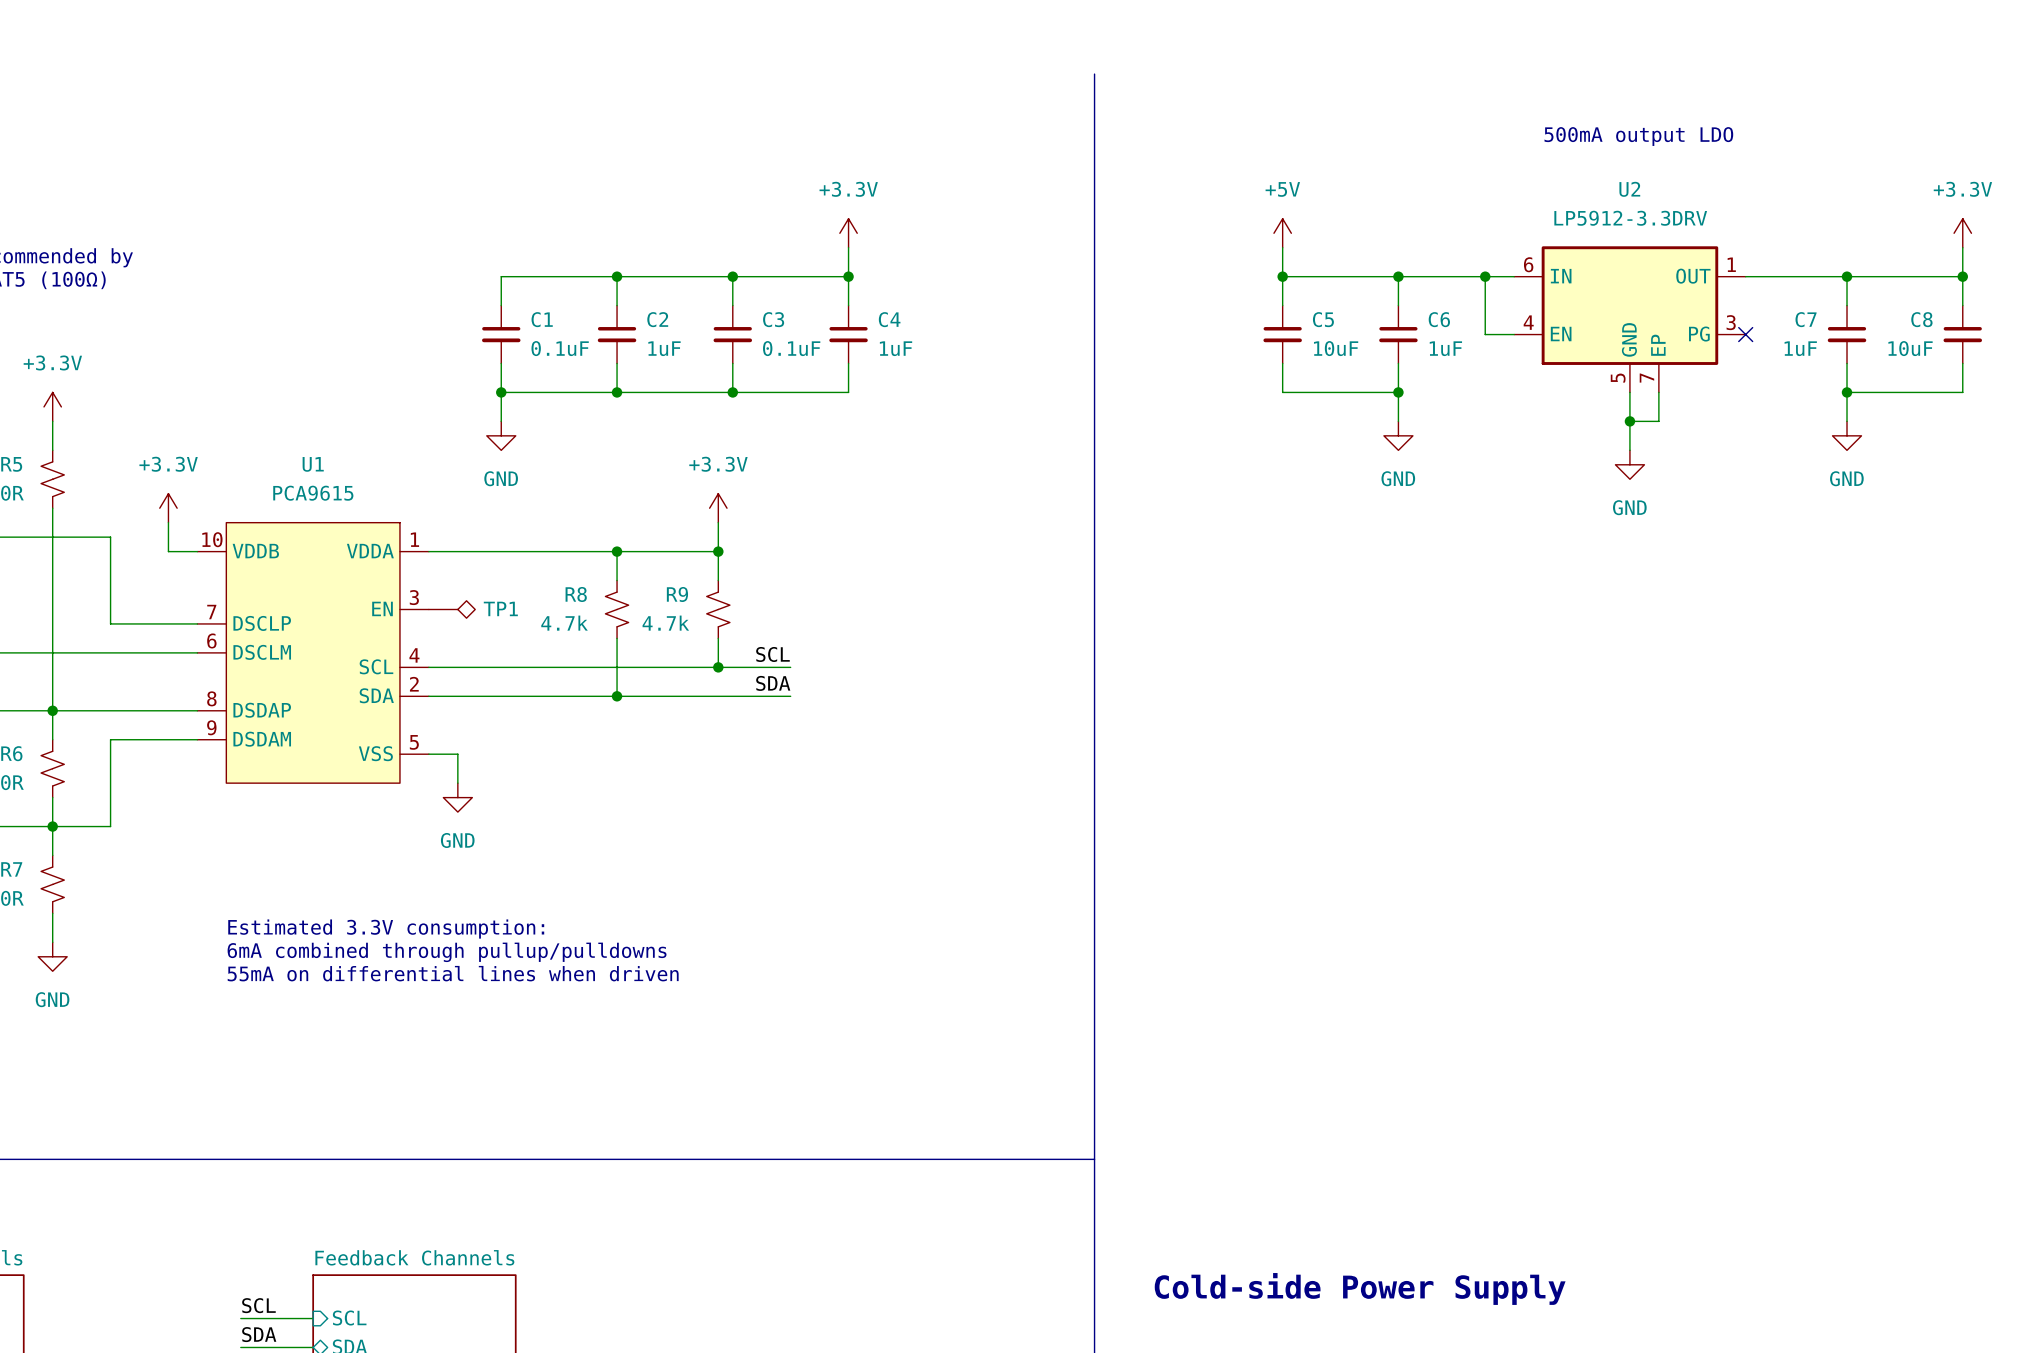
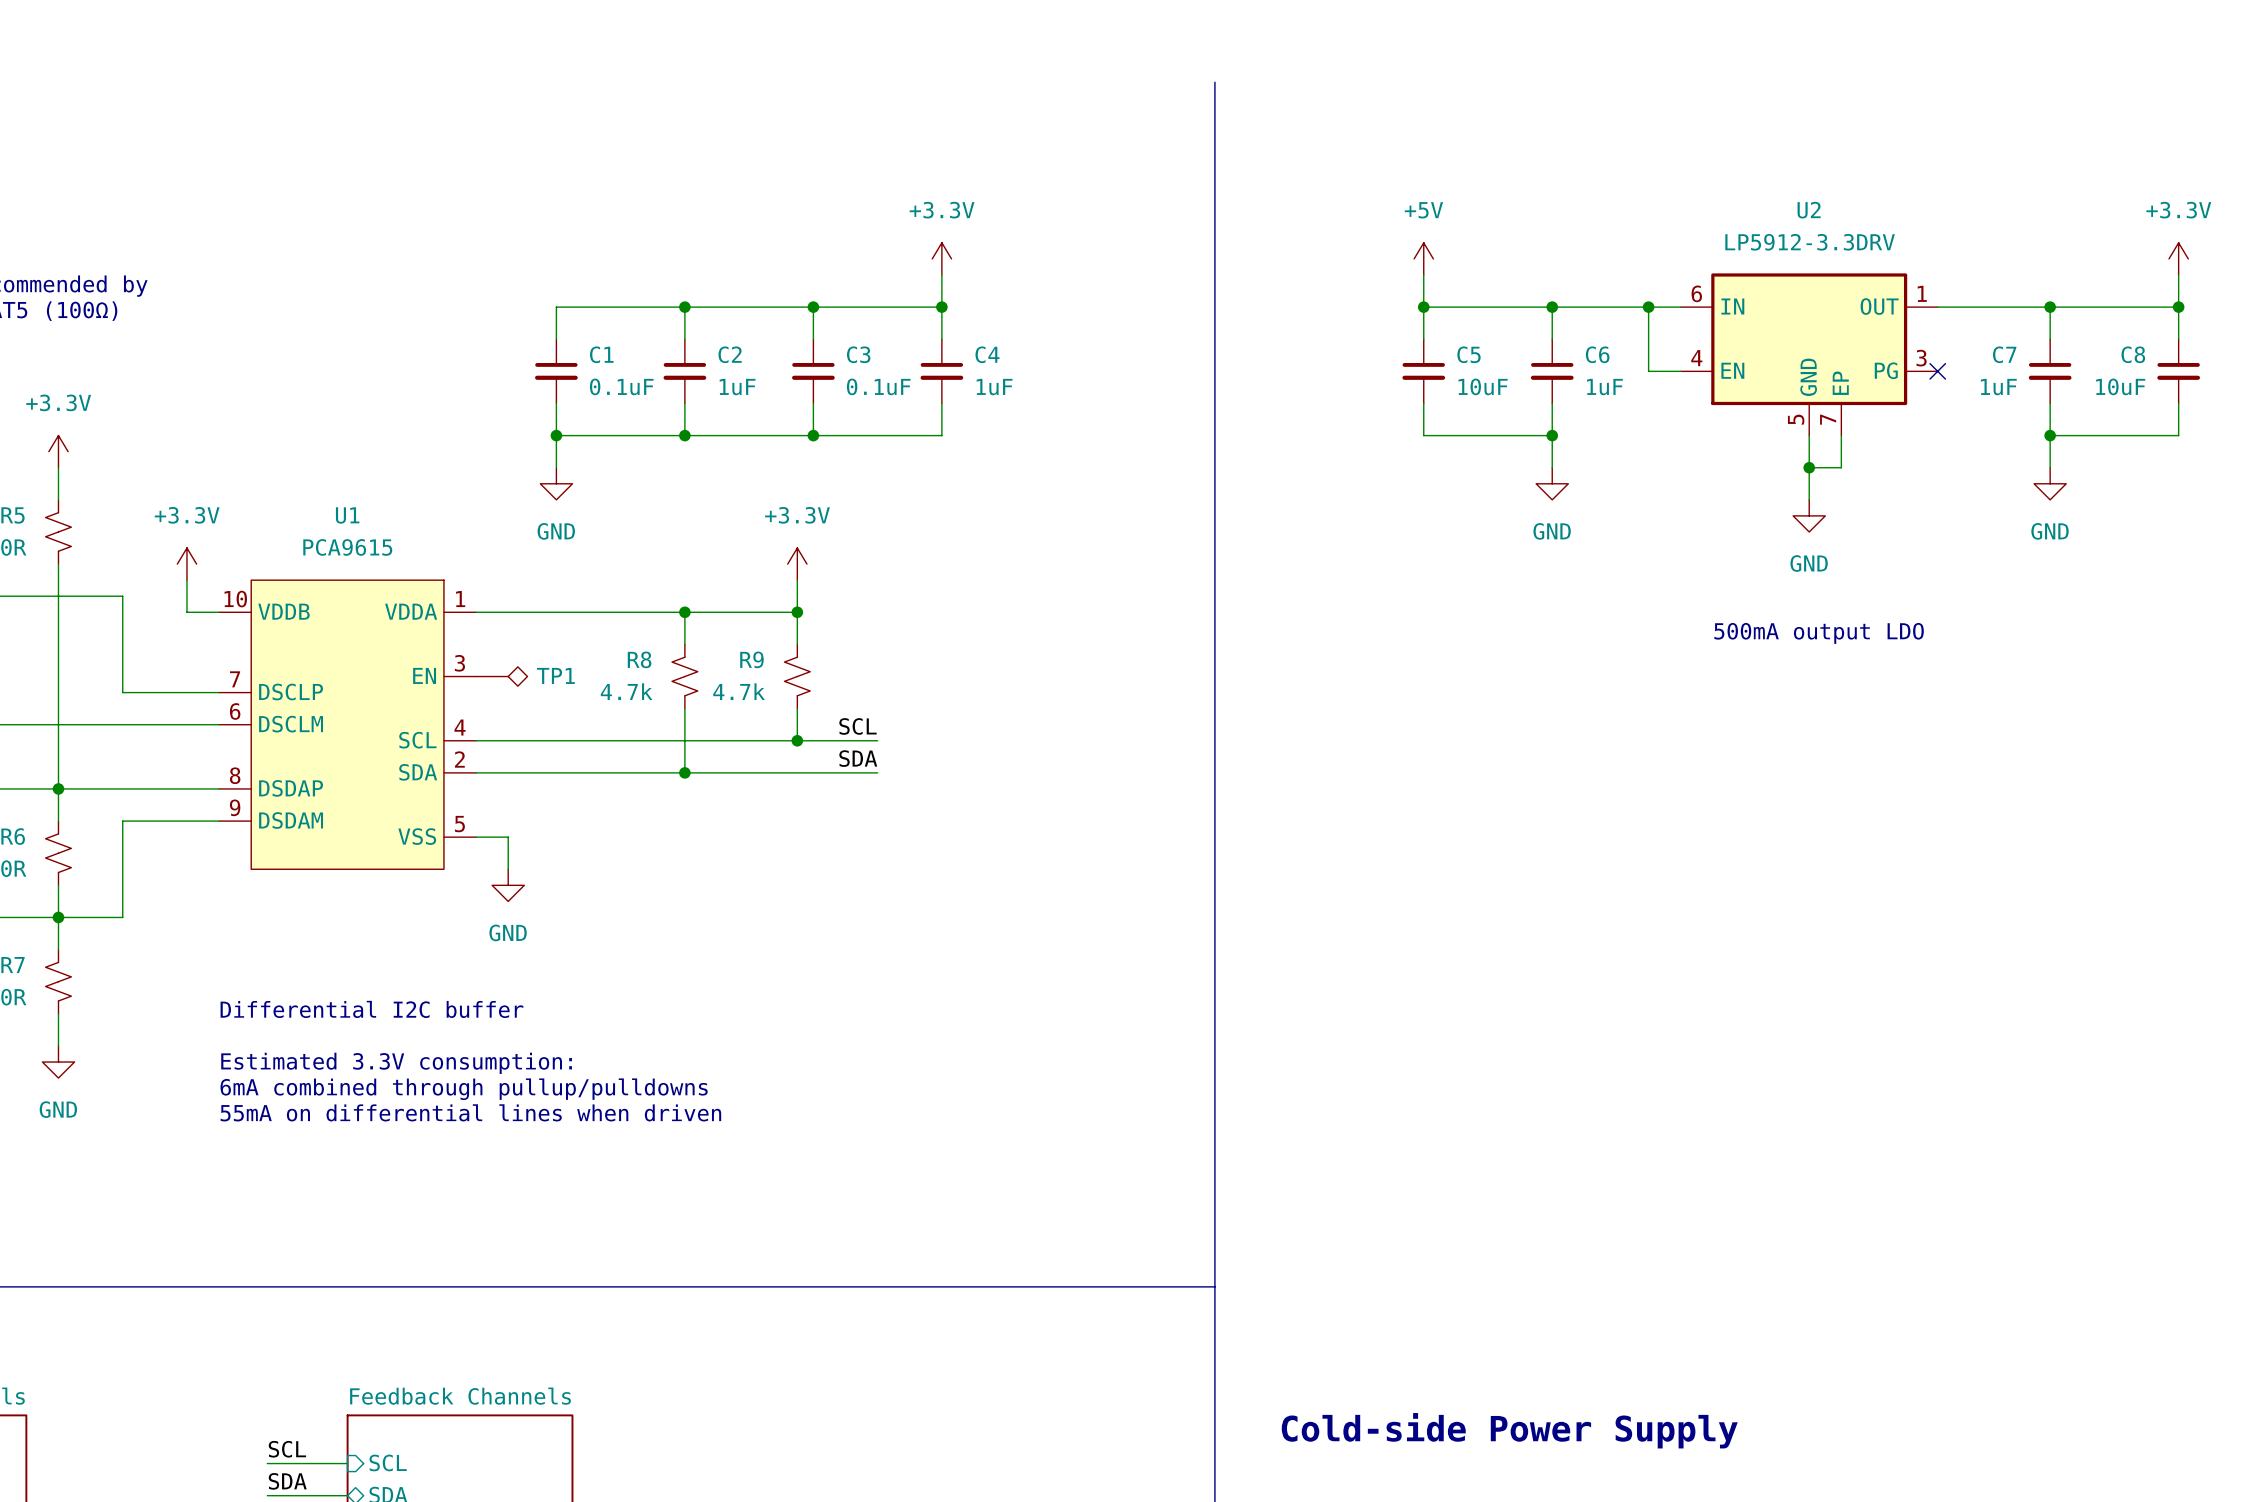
text: 500mA output LDO (1638, 136) -> none
text: none -> 500mA output LDO (1819, 633)
text: none -> Differential I2C buffer (371, 1009)
text position: Estimated 3.3V consumption: (386, 929) -> Estimated 3.3V consumption: (396, 1063)
text position: 6mA combined through pullup/pulldowns (447, 952) -> 6mA combined through pullup/pulldowns (464, 1089)
text position: 55mA on differential lines when driven (453, 973) -> 55mA on differential lines when driven (470, 1112)

